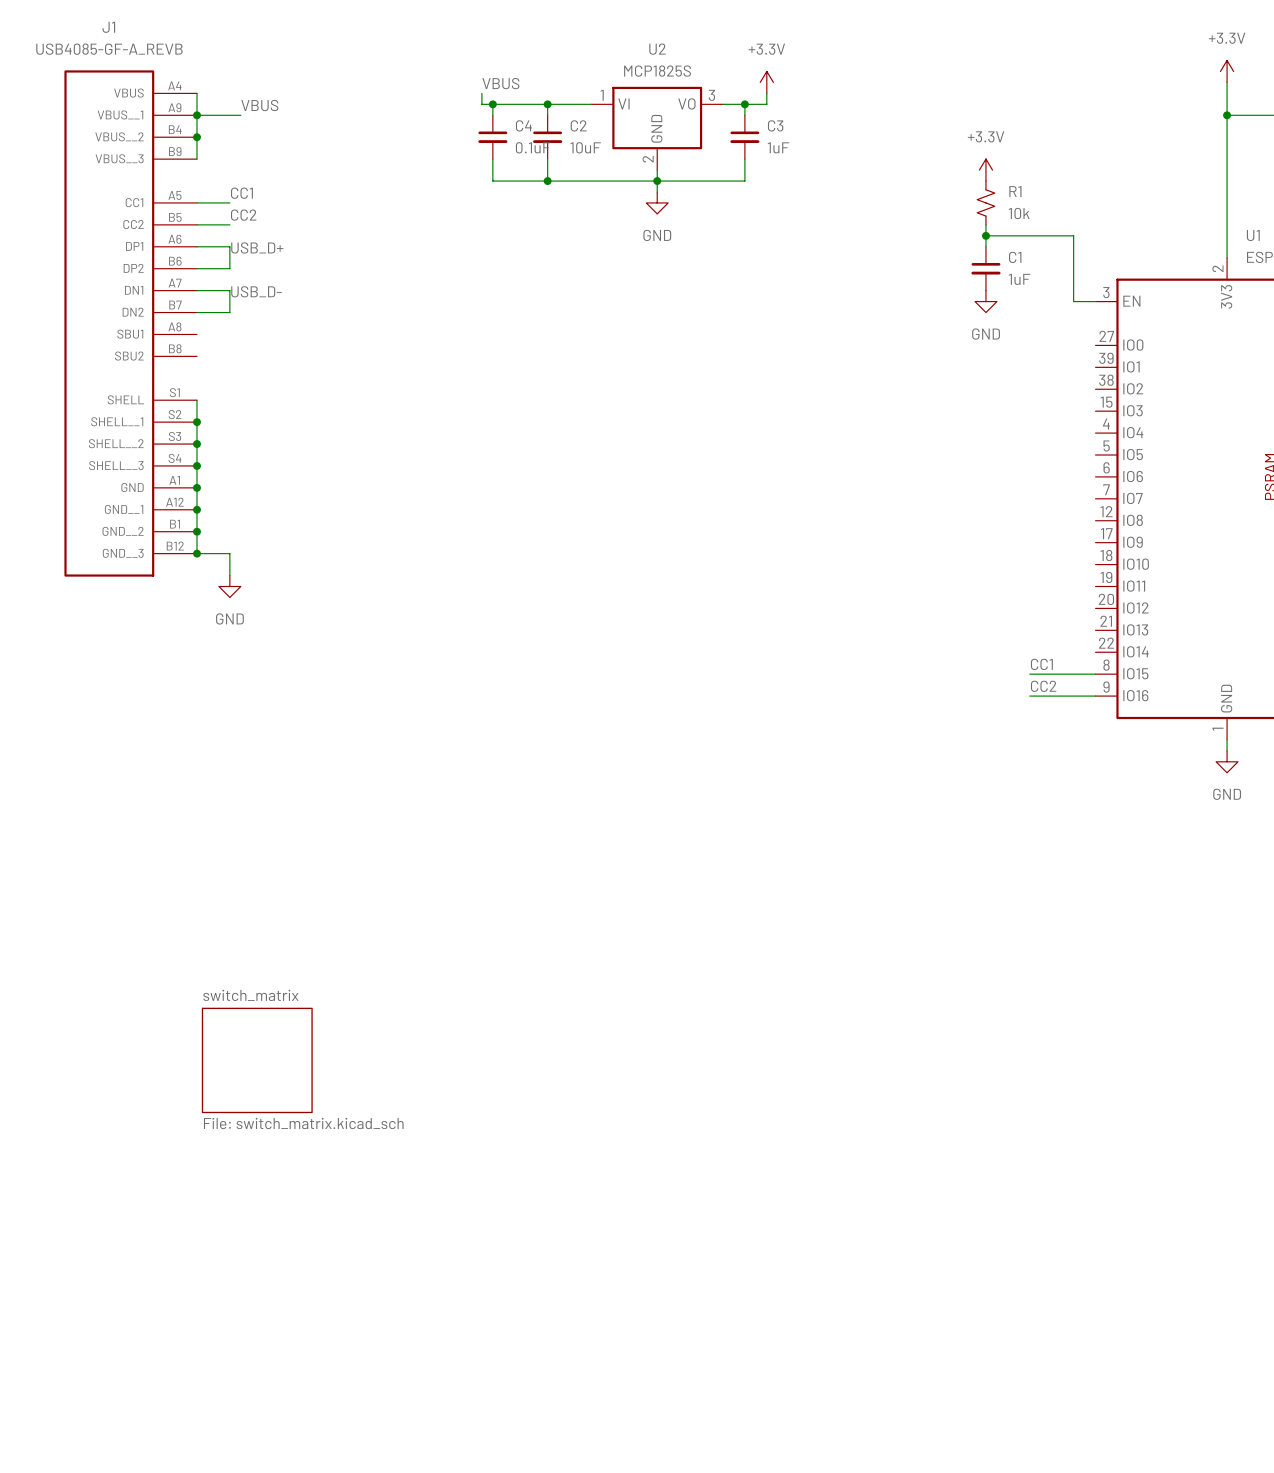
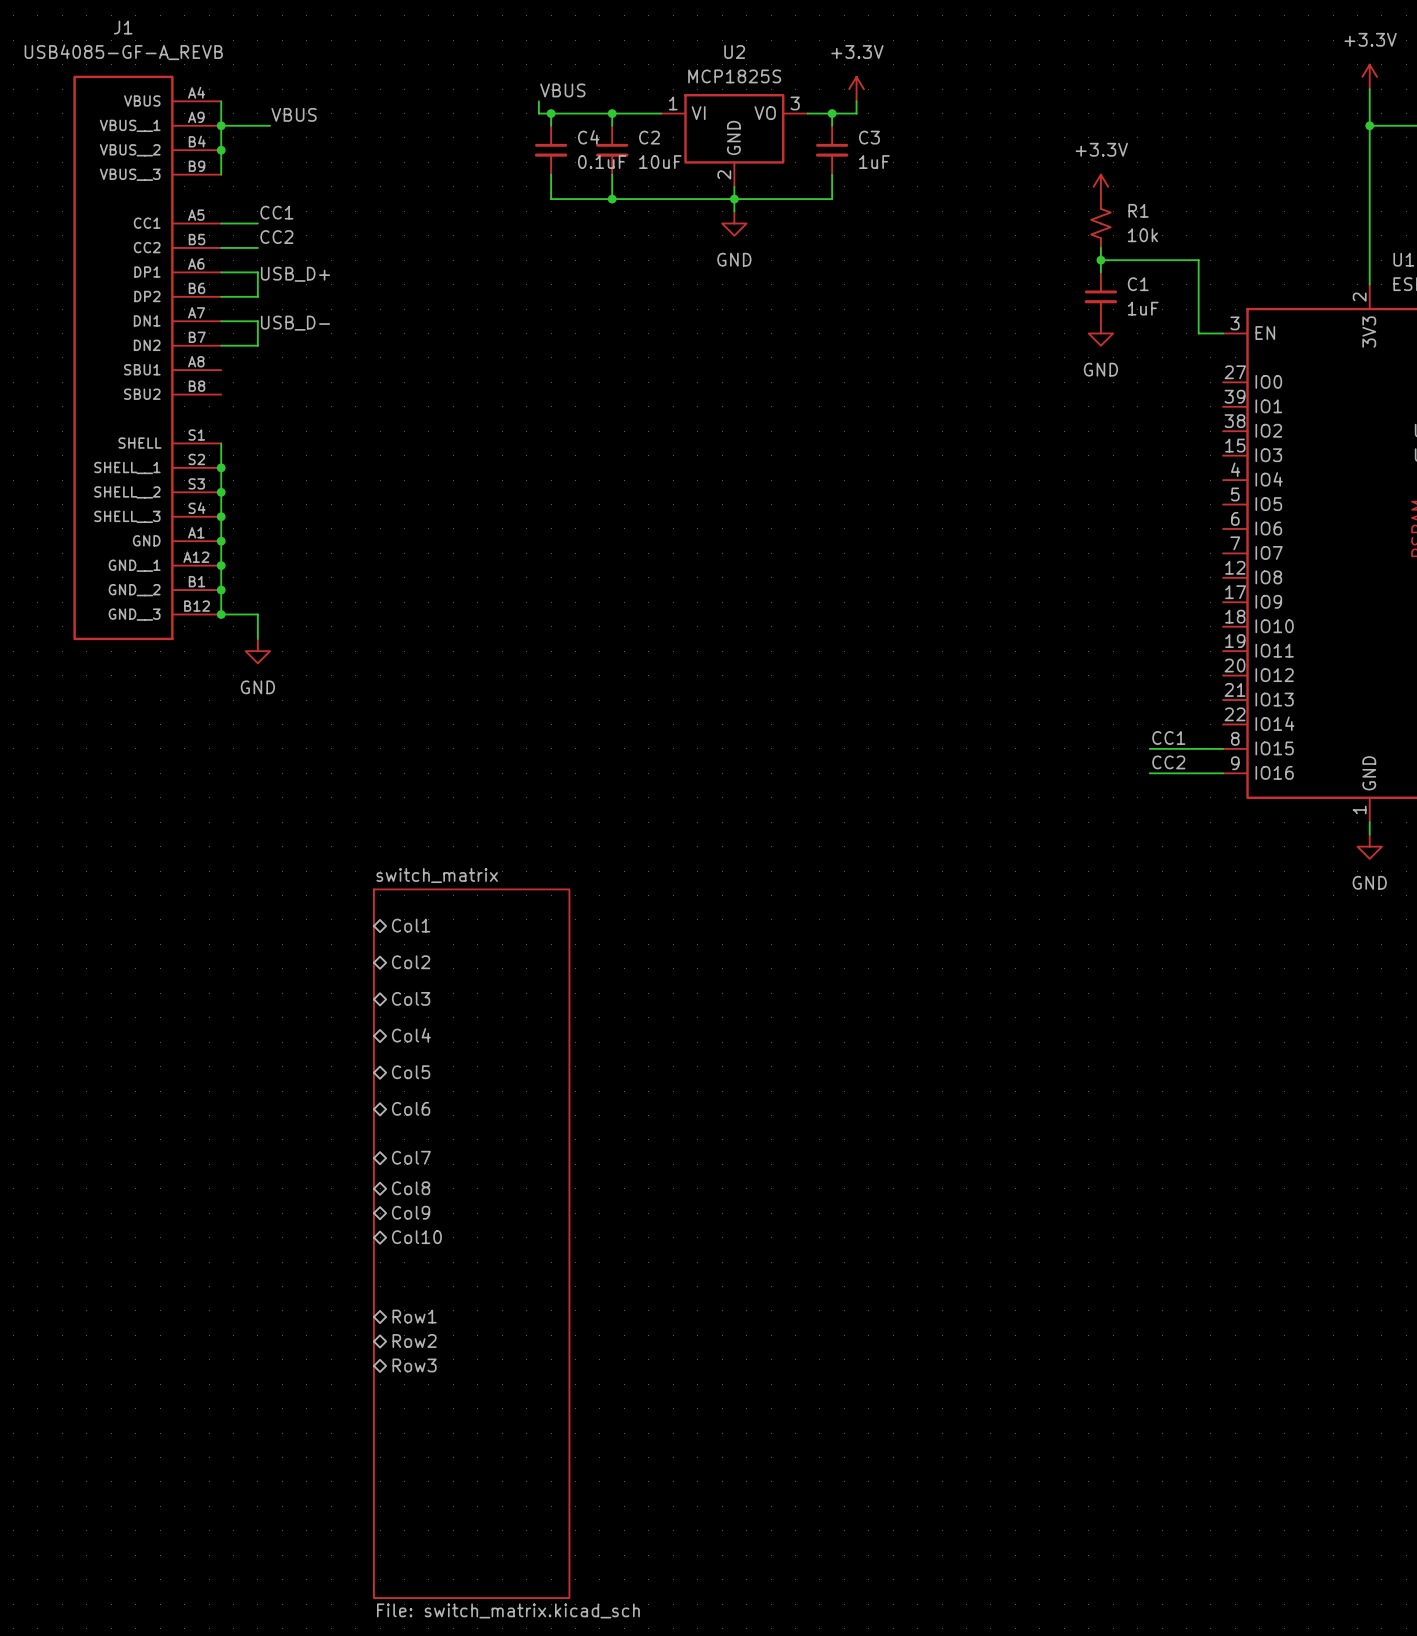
sheet pin: none -> Col1 (411, 925)
sheet pin: none -> Col2 (411, 962)
sheet pin: none -> Col3 (411, 998)
sheet pin: none -> Col4 (411, 1035)
sheet pin: none -> Col5 (411, 1072)
sheet pin: none -> Col6 (411, 1108)
sheet pin: none -> Col7 (411, 1157)
sheet switch_matrix: File: switch_matrix.kicad_sch (257, 1060) -> none
sheet pin: none -> Col8 (411, 1188)
sheet pin: none -> Col9 (411, 1212)
sheet pin: none -> Col10 (416, 1237)
sheet switch_matrix: none -> File: switch_matrix.kicad_sch (471, 1243)
sheet pin: none -> Row1 (414, 1316)
sheet pin: none -> Row2 (414, 1341)
sheet pin: none -> Row3 (414, 1365)

